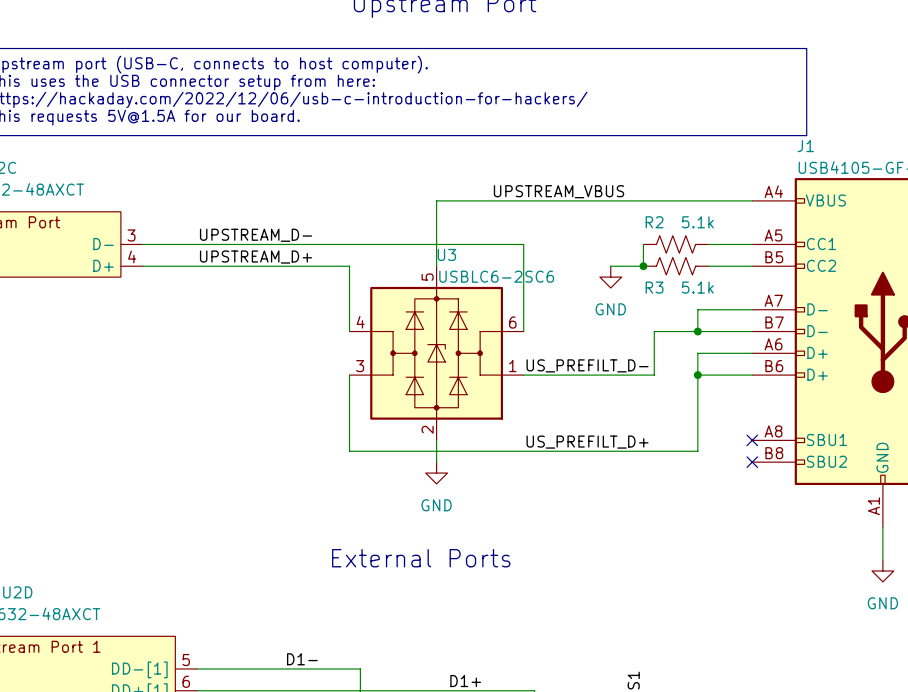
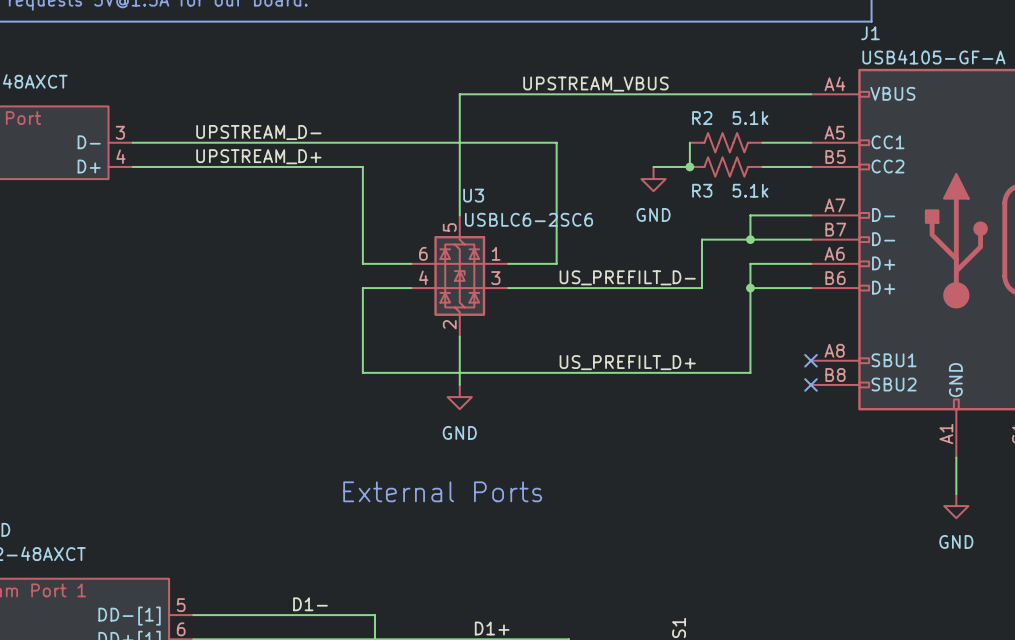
U3 name position: U3 (446, 254) -> U3 (473, 195)
U3 symbol: [349, 266, 524, 441] -> [411, 215, 509, 337]
U3 value position: USBLC6-2SC6 (496, 276) -> USBLC6-2SC6 (529, 219)
wire: none -> (362, 239) (362, 263) (411, 263)
wire: none -> (556, 239) (556, 263) (508, 263)

